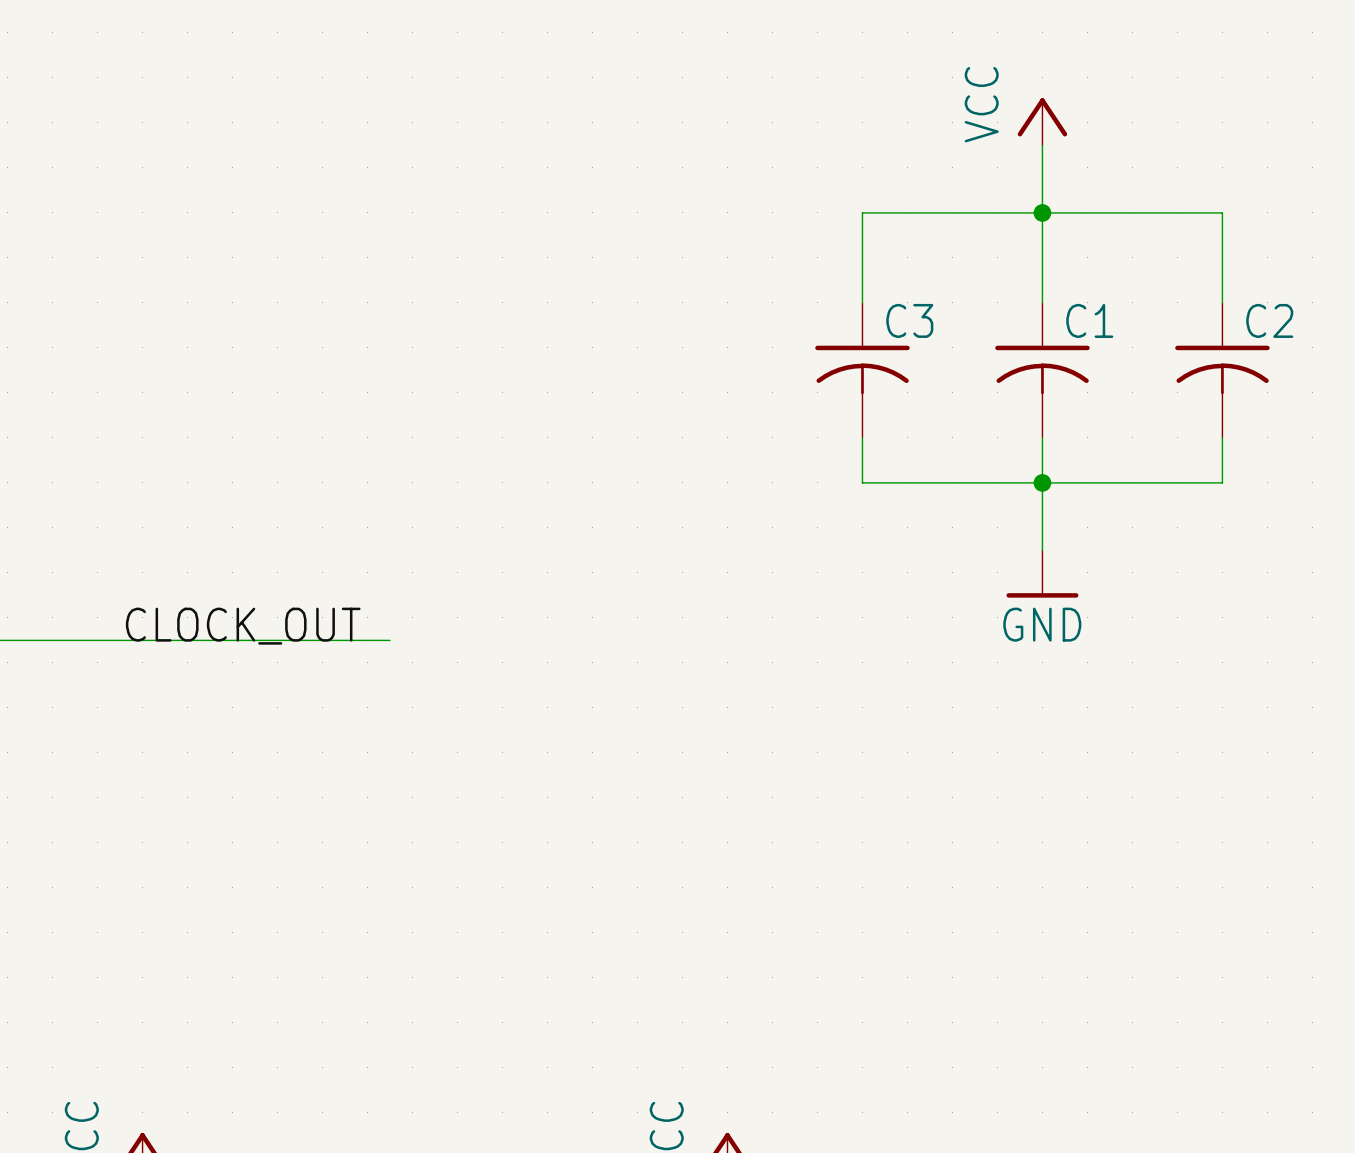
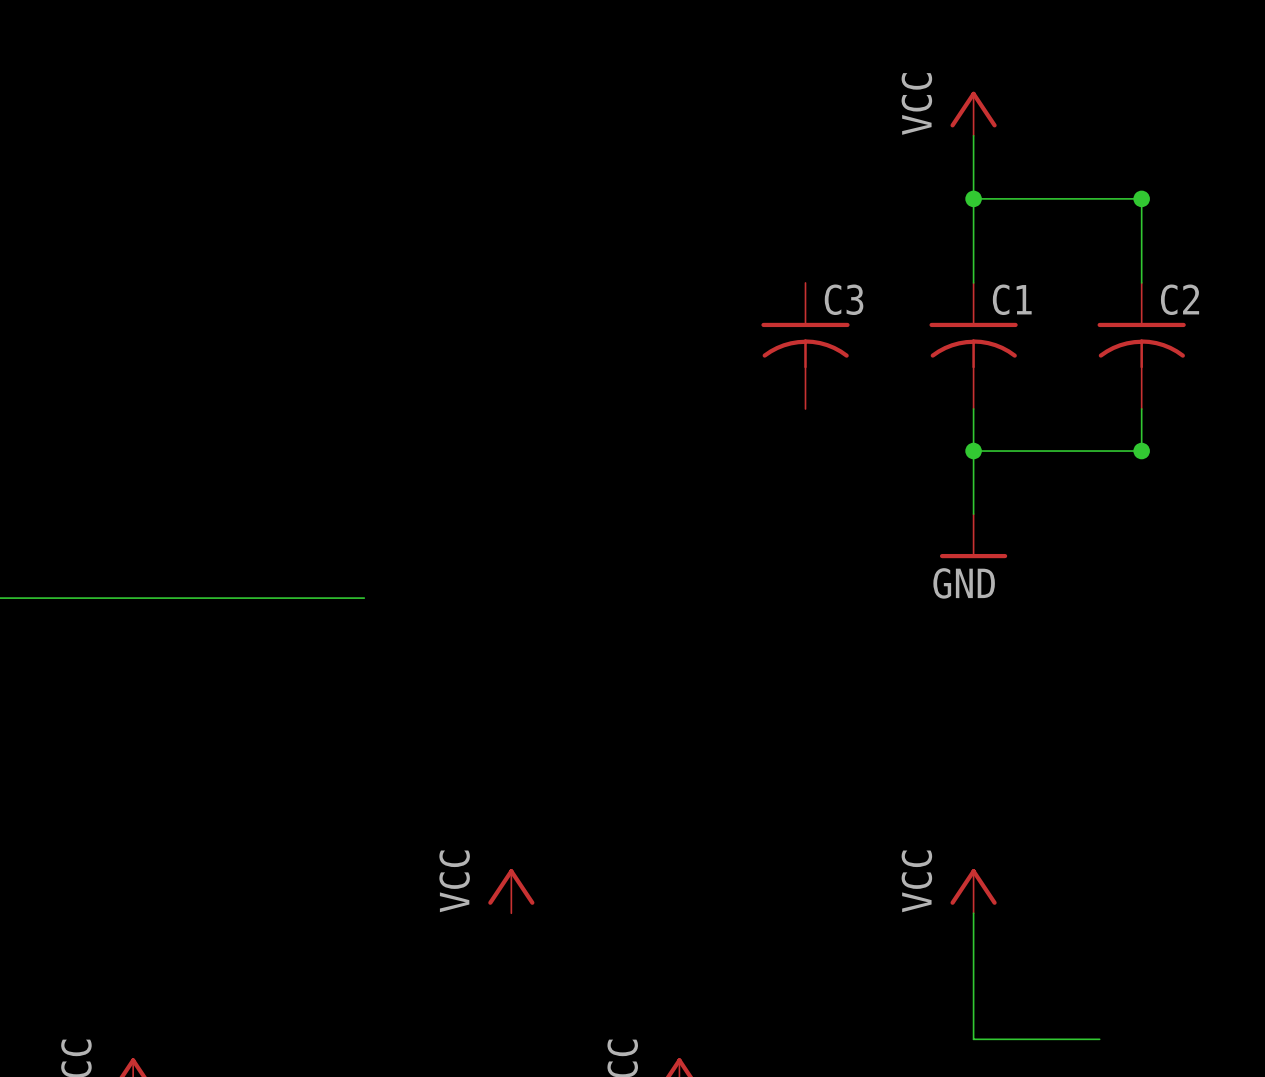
wire: (1042, 212) (862, 212) (862, 302) -> none
junction: none -> (1141, 198)
wire: (862, 437) (862, 482) (1042, 482) -> none
junction: none -> (1141, 451)
label: CLOCK_OUT (243, 626) -> none
power symbol: none -> VCC (511, 891)
power symbol: none -> VCC (973, 891)
wire: none -> (973, 913) (973, 1039) (1099, 1039)

